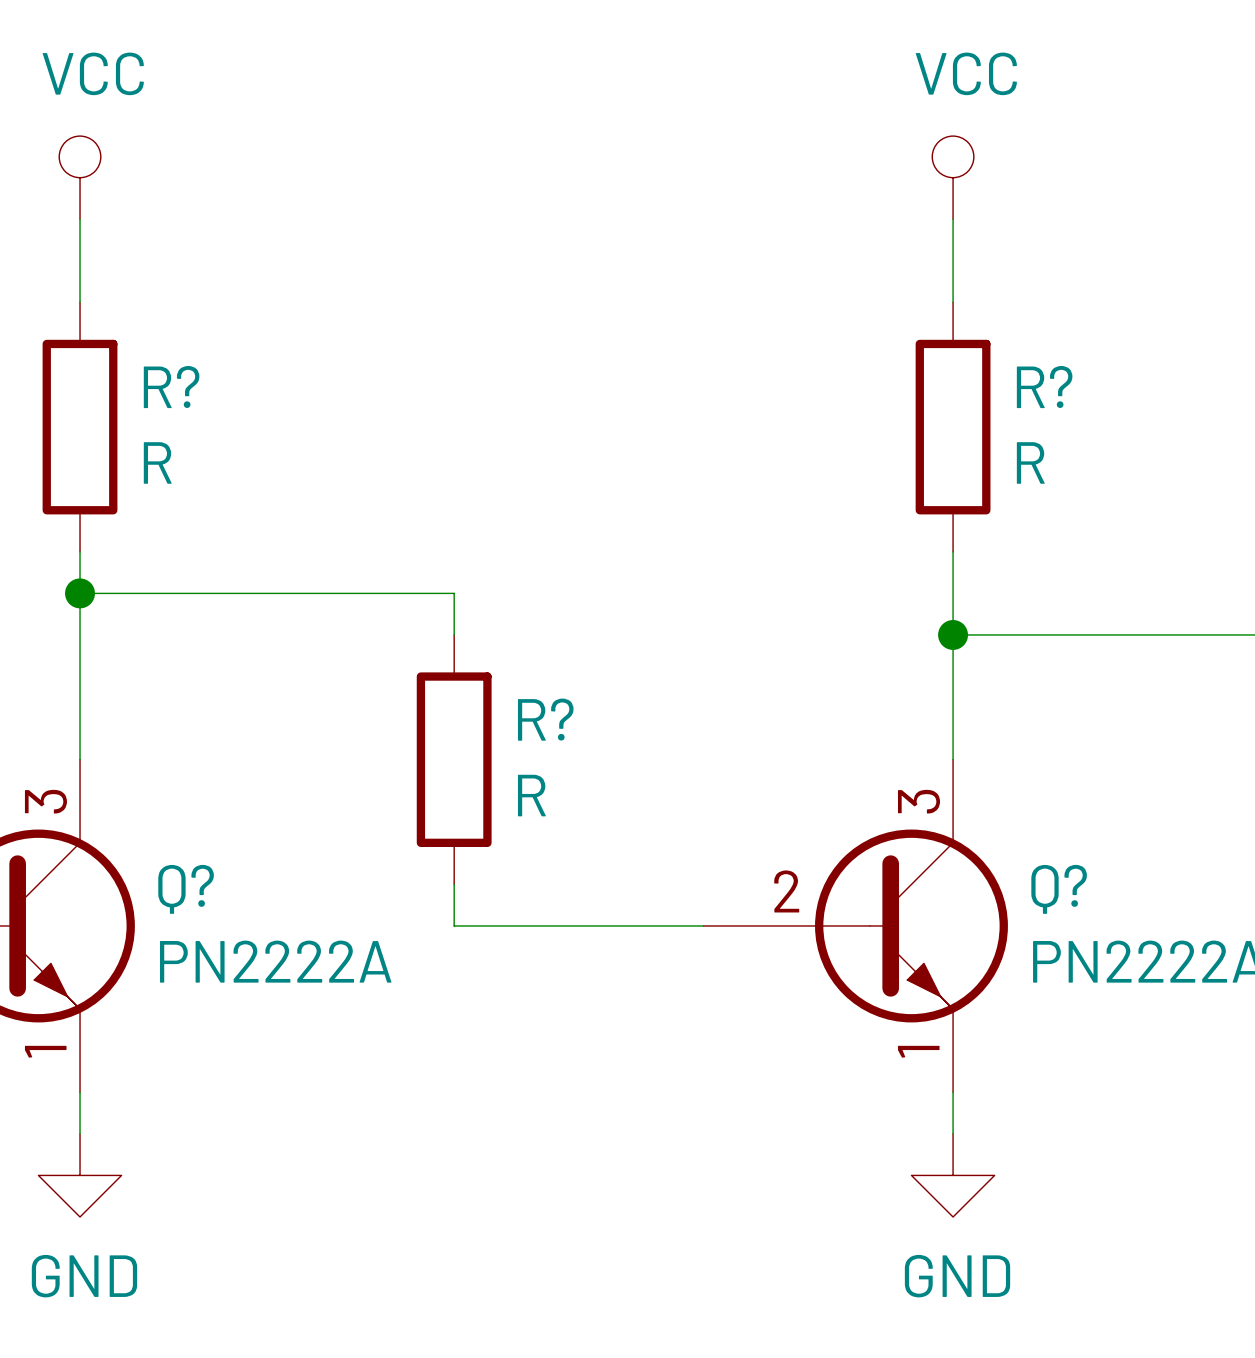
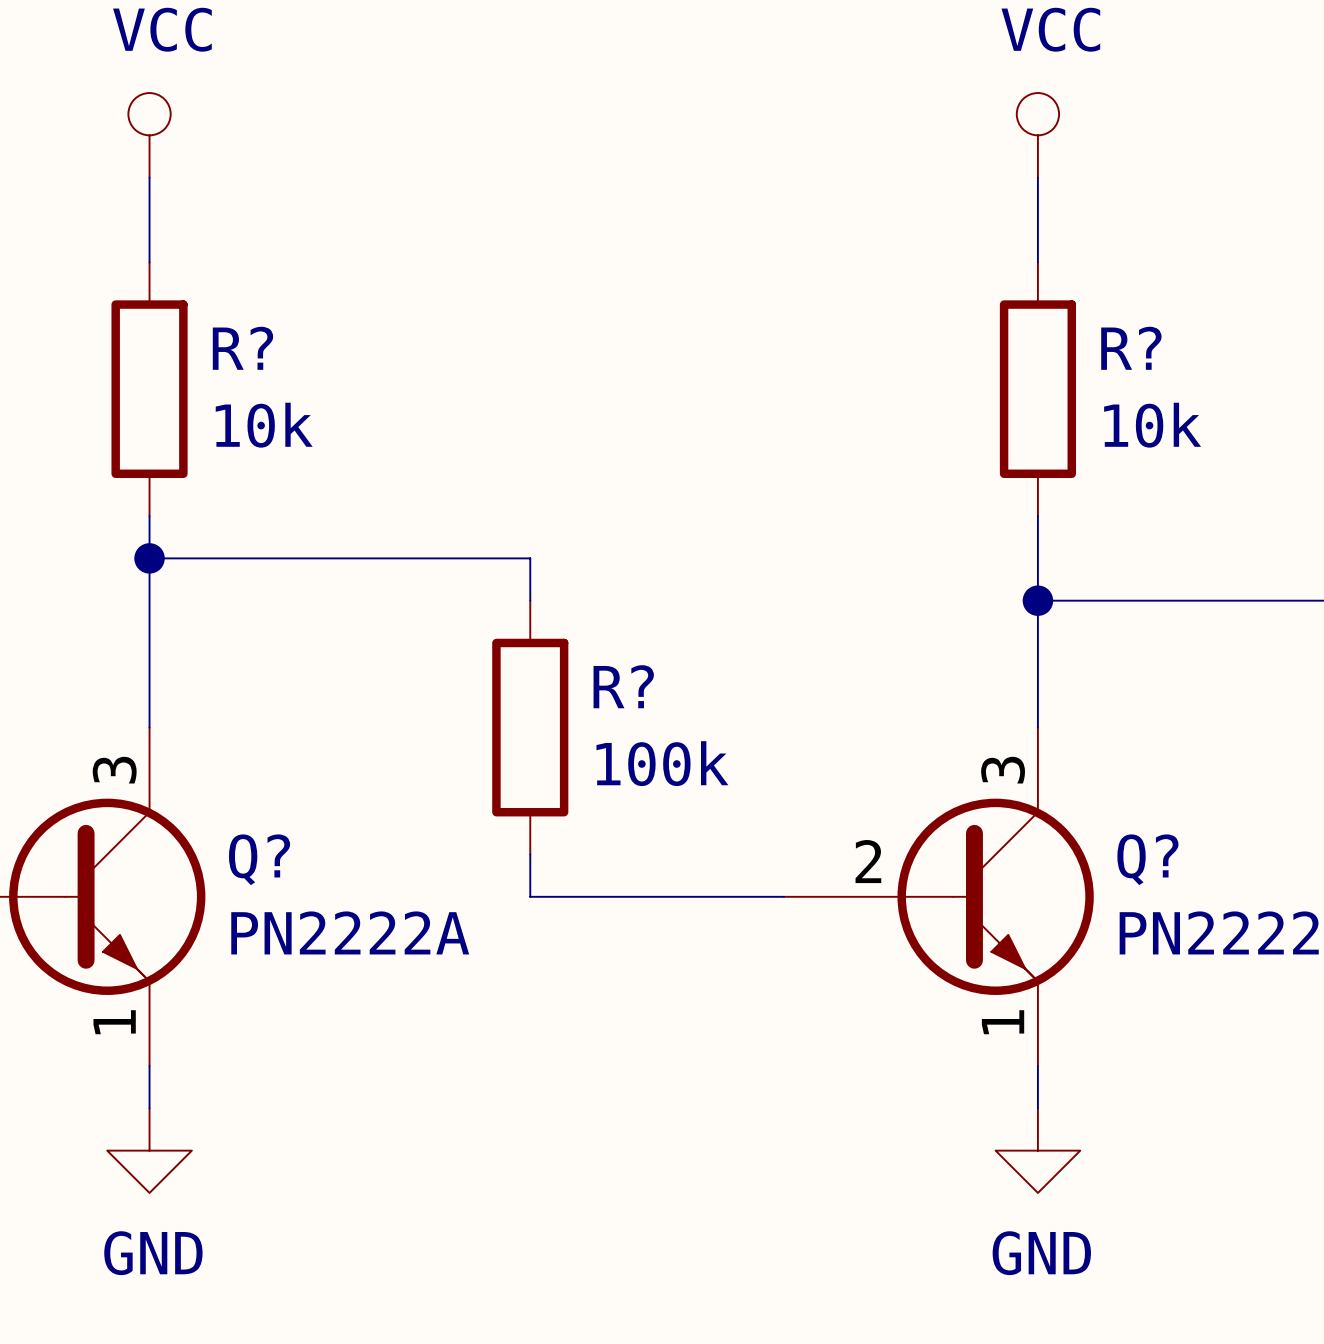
R? value: R (157, 462) -> 10k (264, 425)
R? value: R (1030, 462) -> 10k (1152, 425)
R? value: R (531, 795) -> 100k (662, 763)

